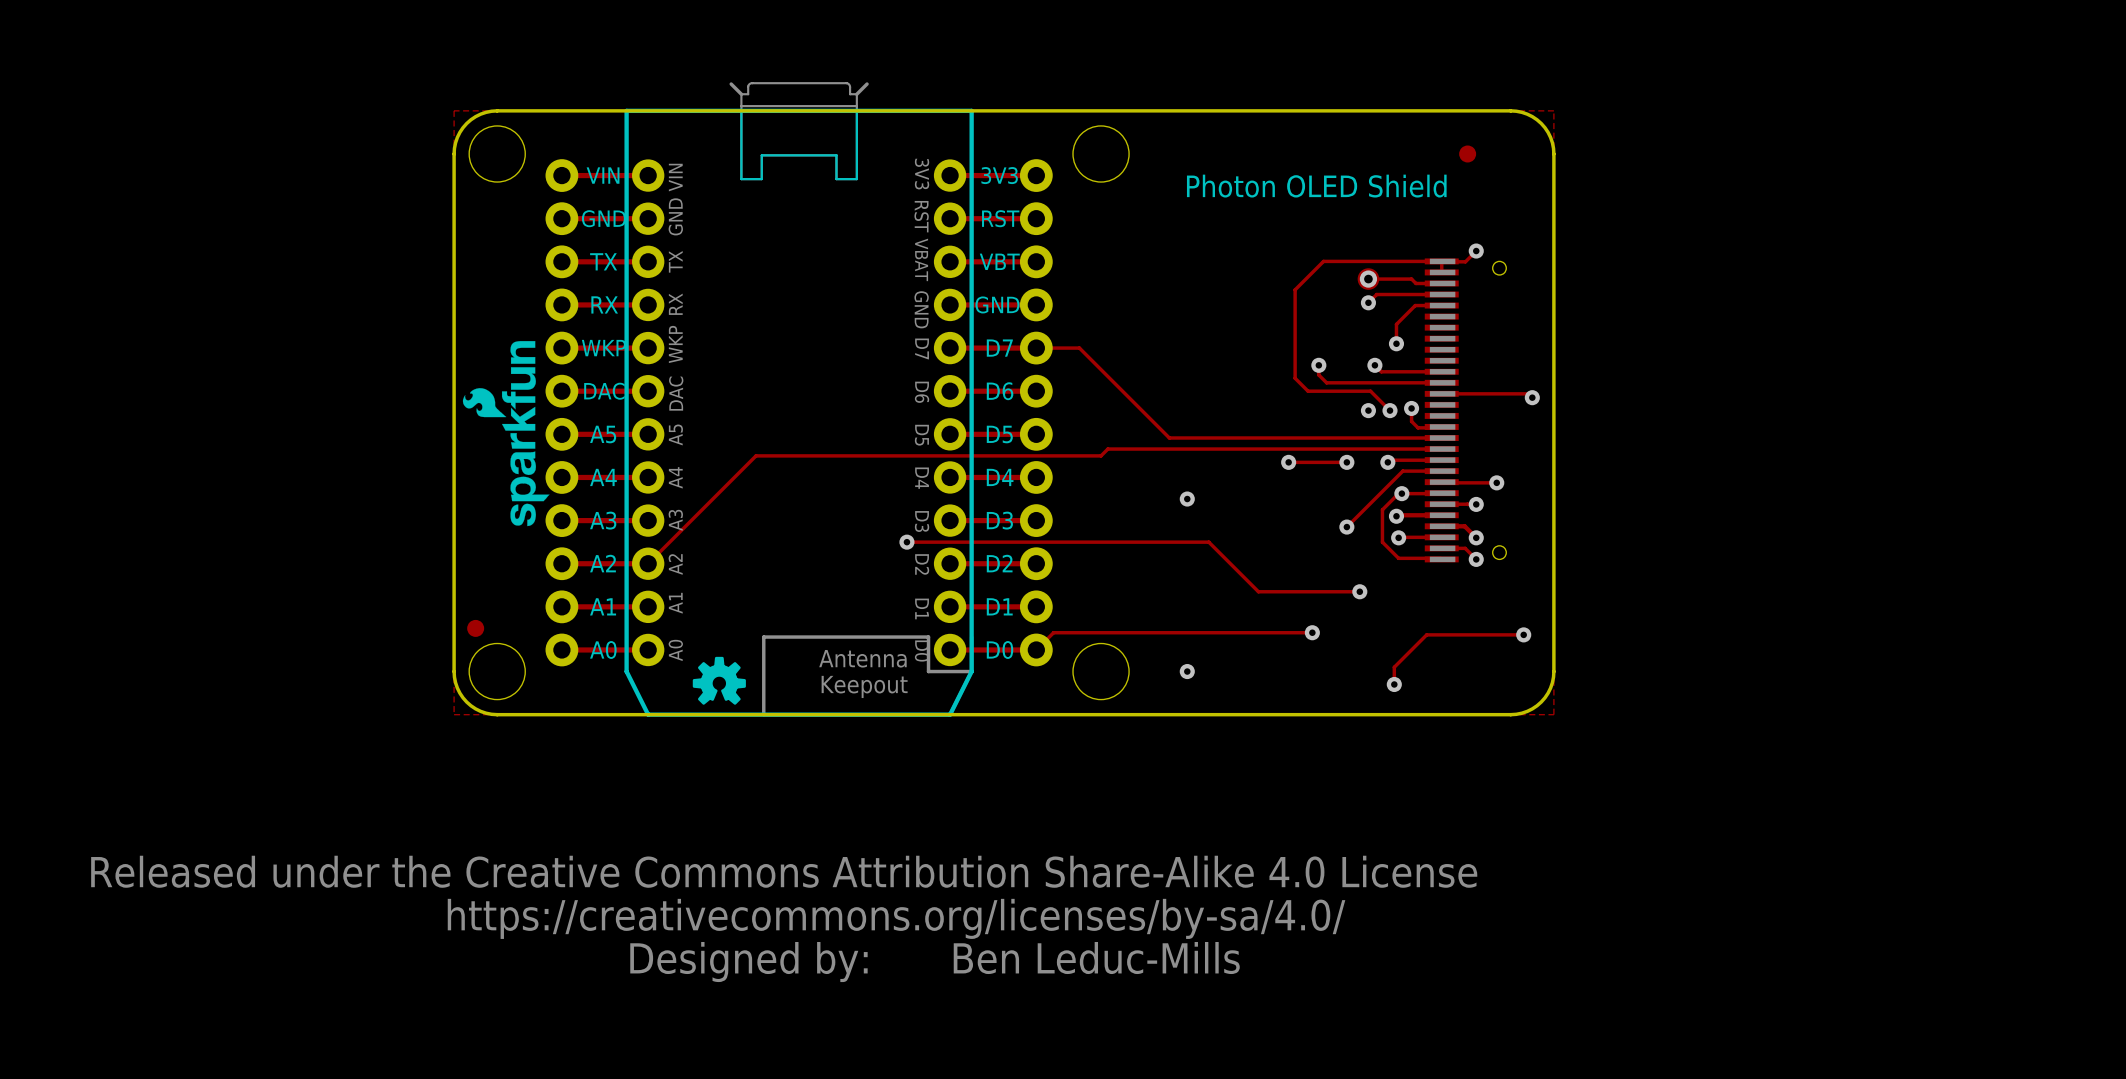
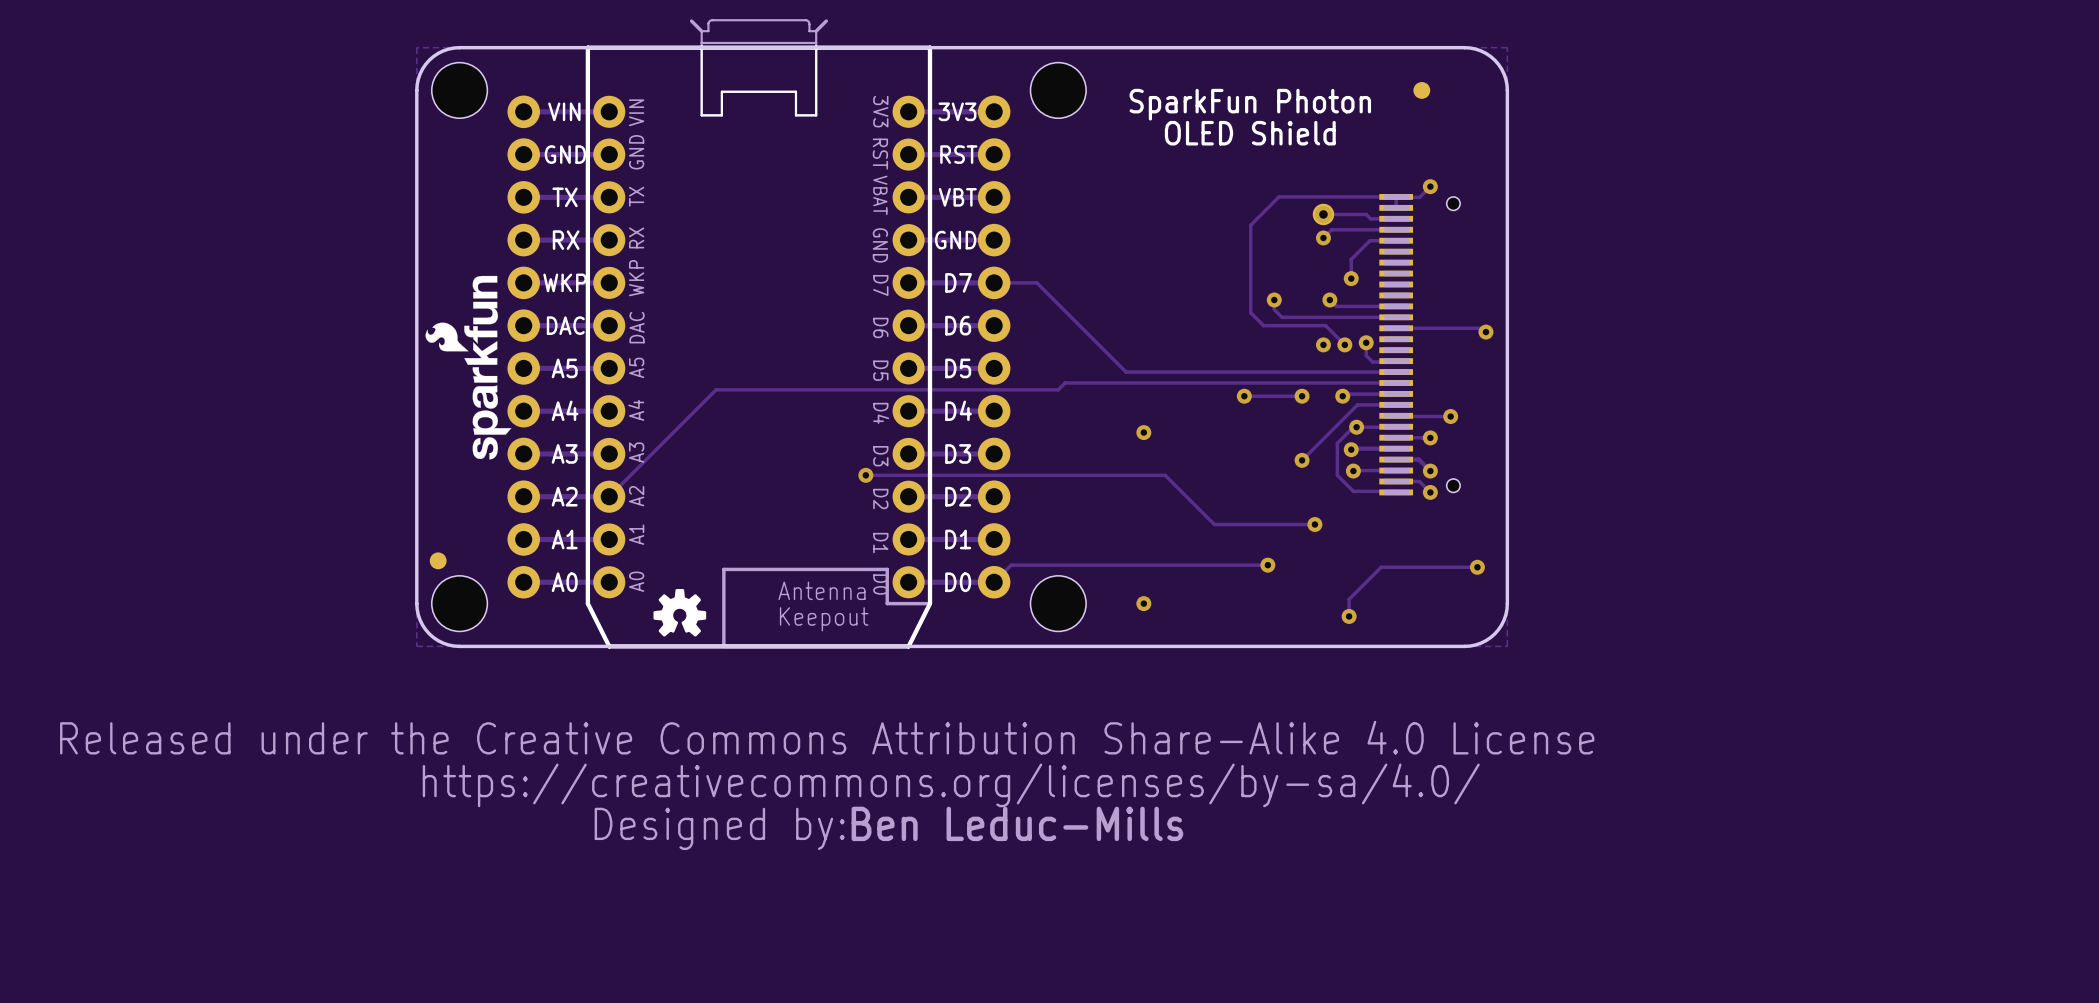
text: none -> SparkFun Photon (1250, 104)
text: Photon OLED Shield (1316, 186) -> OLED Shield (1250, 133)
drawing position: (784, 918) -> (827, 785)
text position: Ben Leduc-Mills (1096, 958) -> Ben Leduc-Mills (1017, 823)

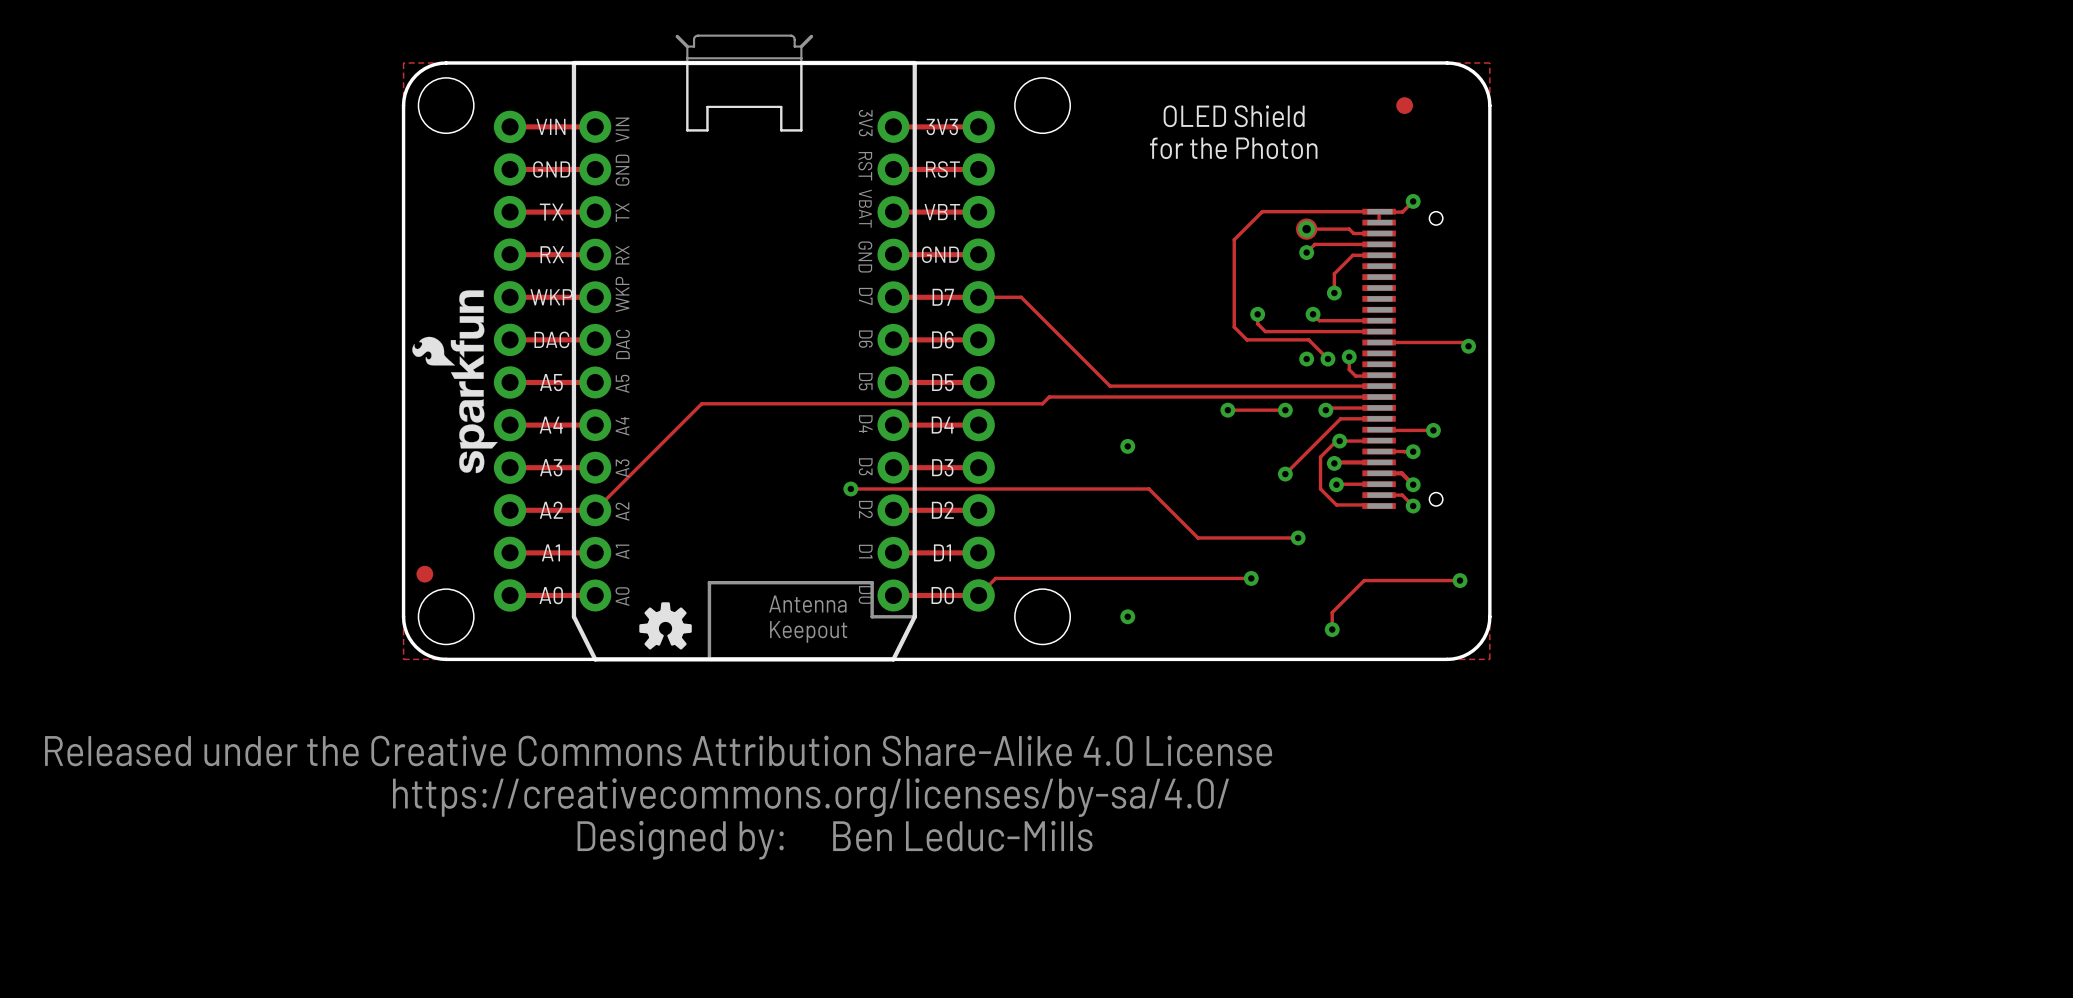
text: SparkFun Photon (1250, 104) -> OLED Shield (1234, 116)
text: OLED Shield (1250, 133) -> for the Photon (1233, 148)

